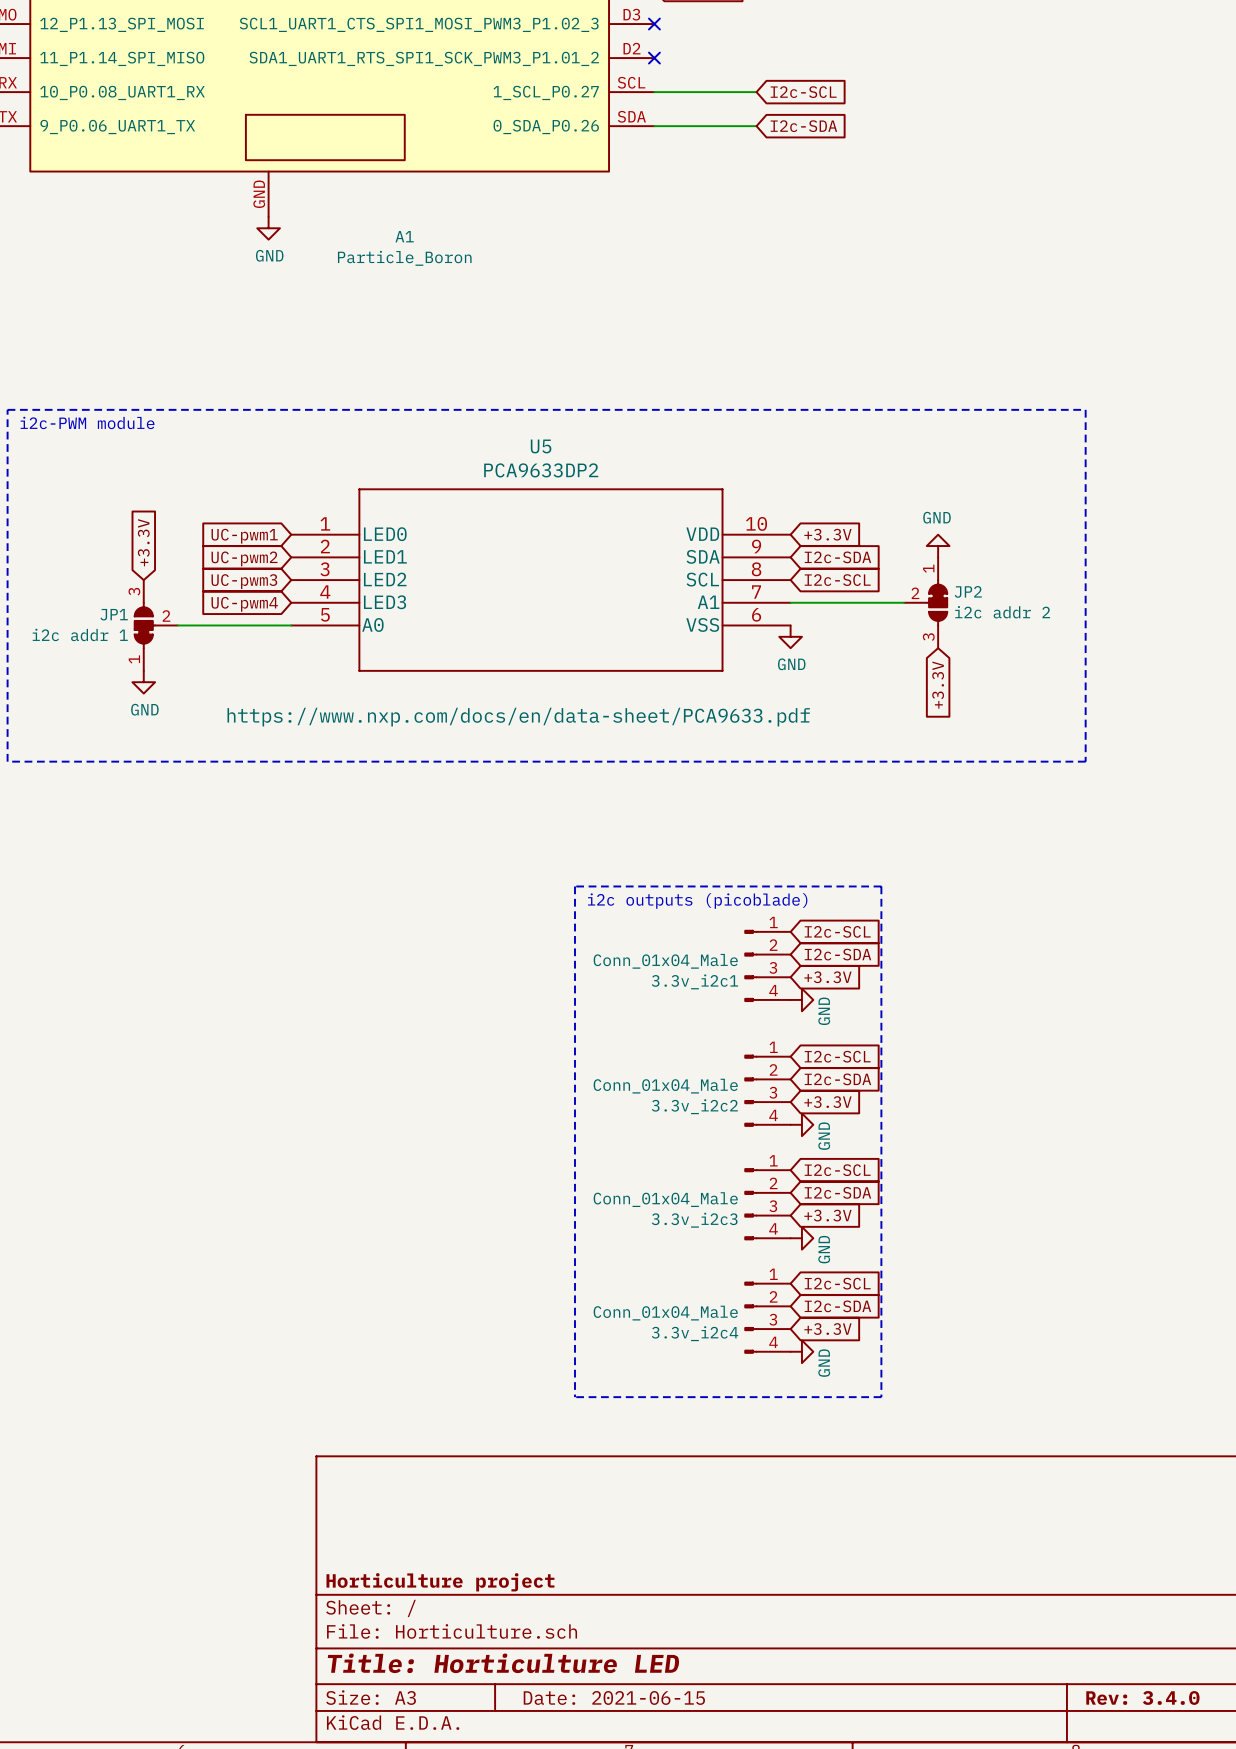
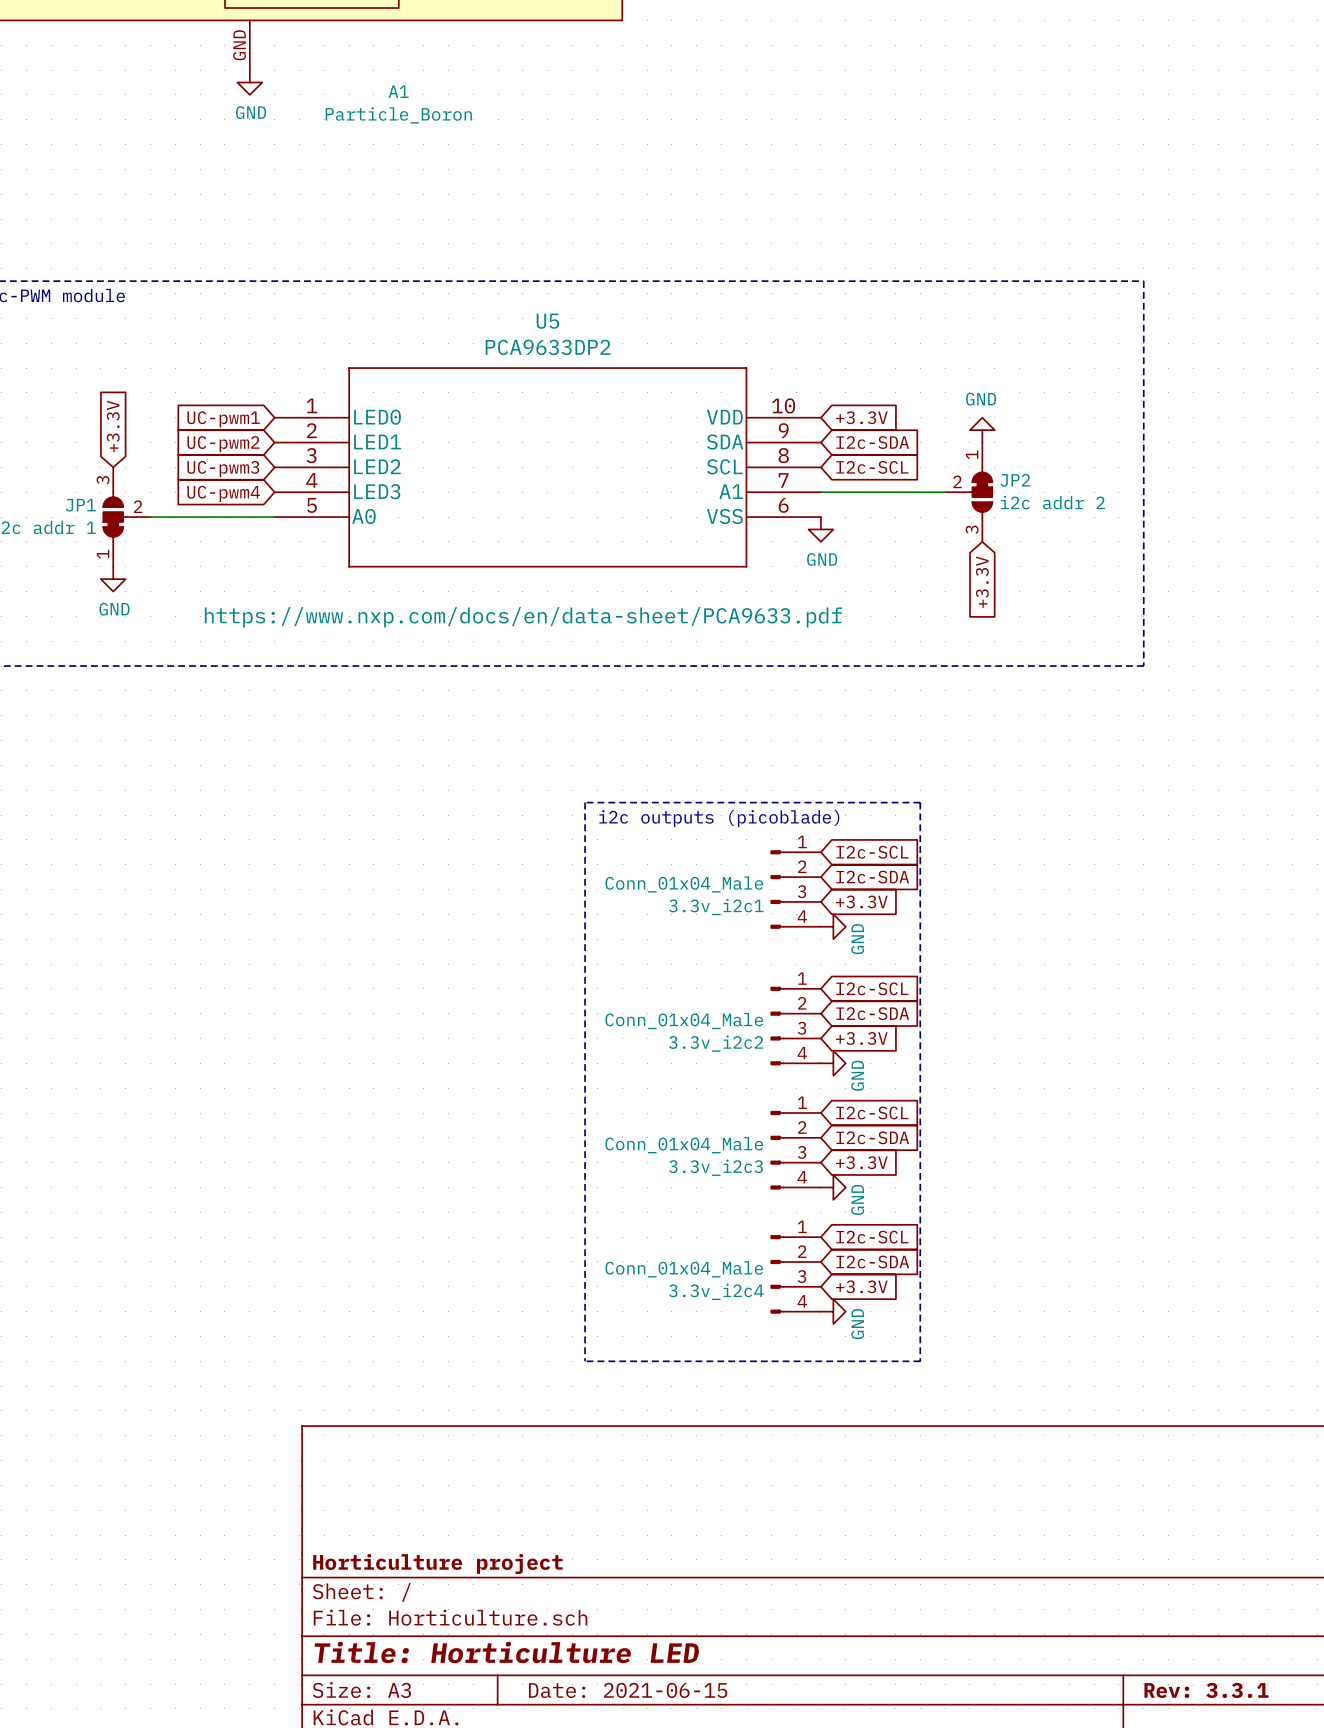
title block: Rev: 3.4.0 (1142, 1697) -> Rev: 3.3.1 (1206, 1690)

